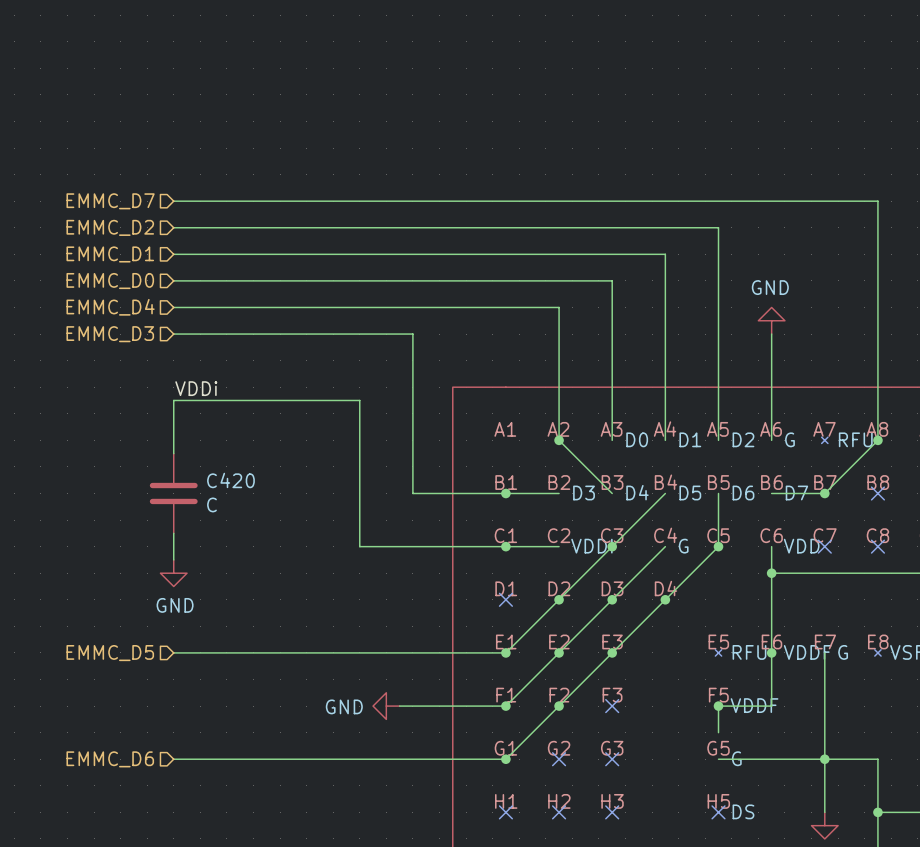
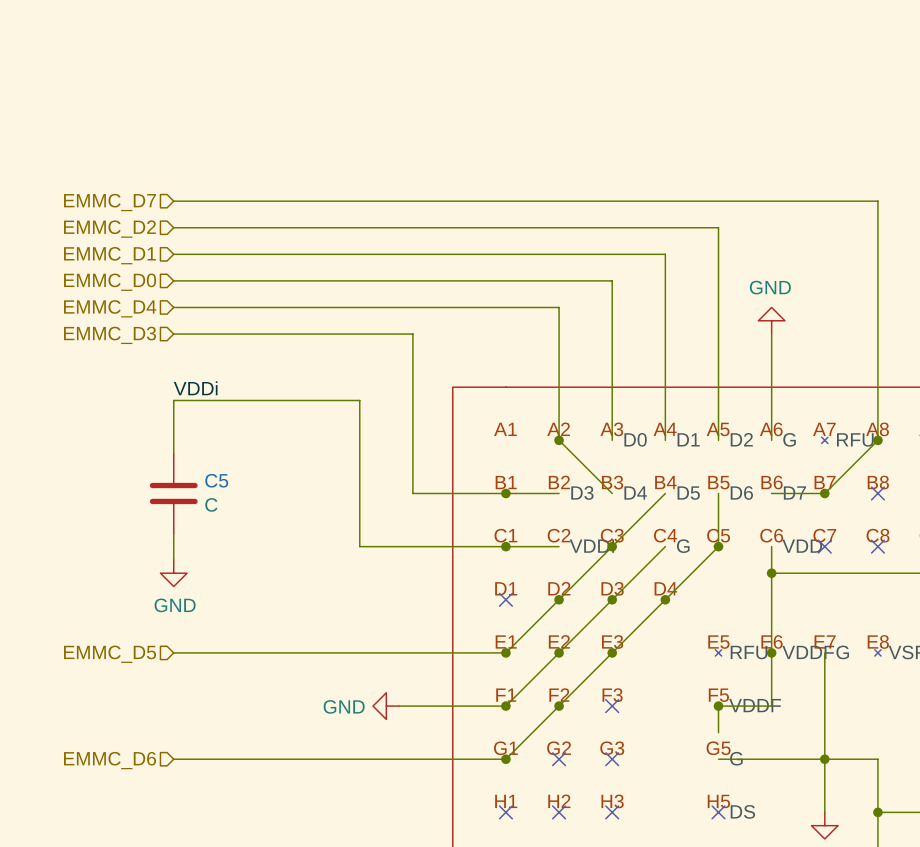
C420 name: C420 (230, 480) -> C5 (216, 480)

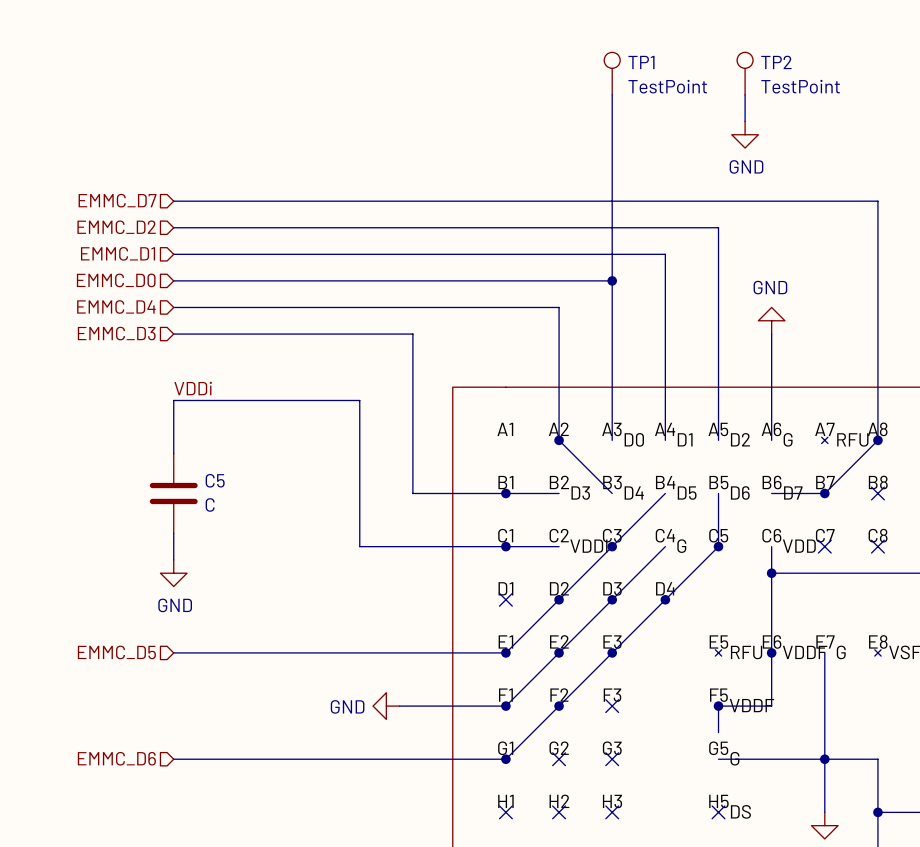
TP1: none -> TestPoint (612, 73)
TP2: none -> TestPoint (745, 73)
wire: none -> (612, 94) (612, 280)
wire: none -> (745, 94) (745, 121)
power symbol: none -> GND (745, 134)
junction: none -> (612, 280)

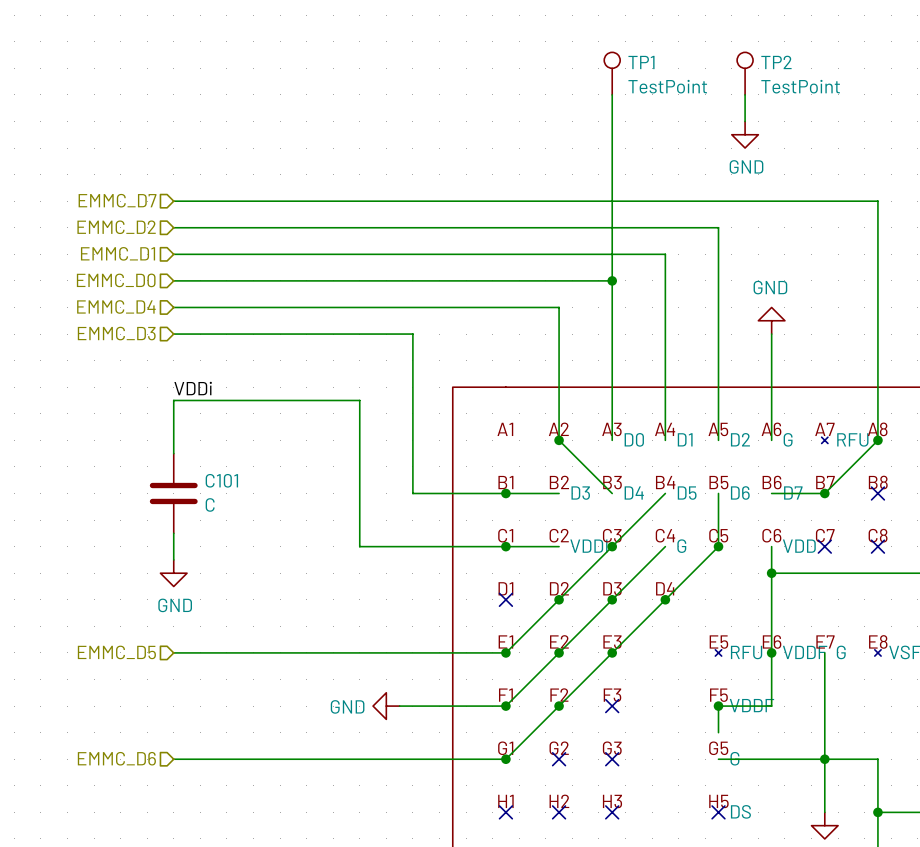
C5 name: C5 (215, 480) -> C101 (221, 480)

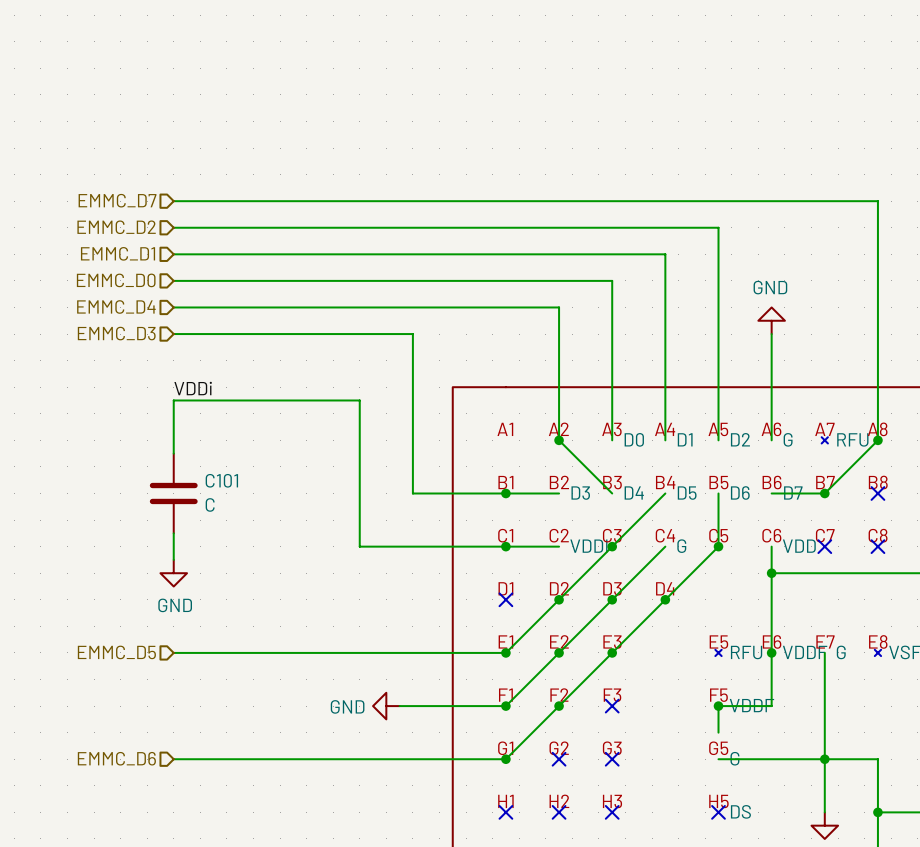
TP1: TestPoint (612, 73) -> none
TP2: TestPoint (745, 73) -> none
wire: (612, 94) (612, 280) -> none
wire: (745, 94) (745, 121) -> none
power symbol: GND (745, 134) -> none
junction: (612, 280) -> none

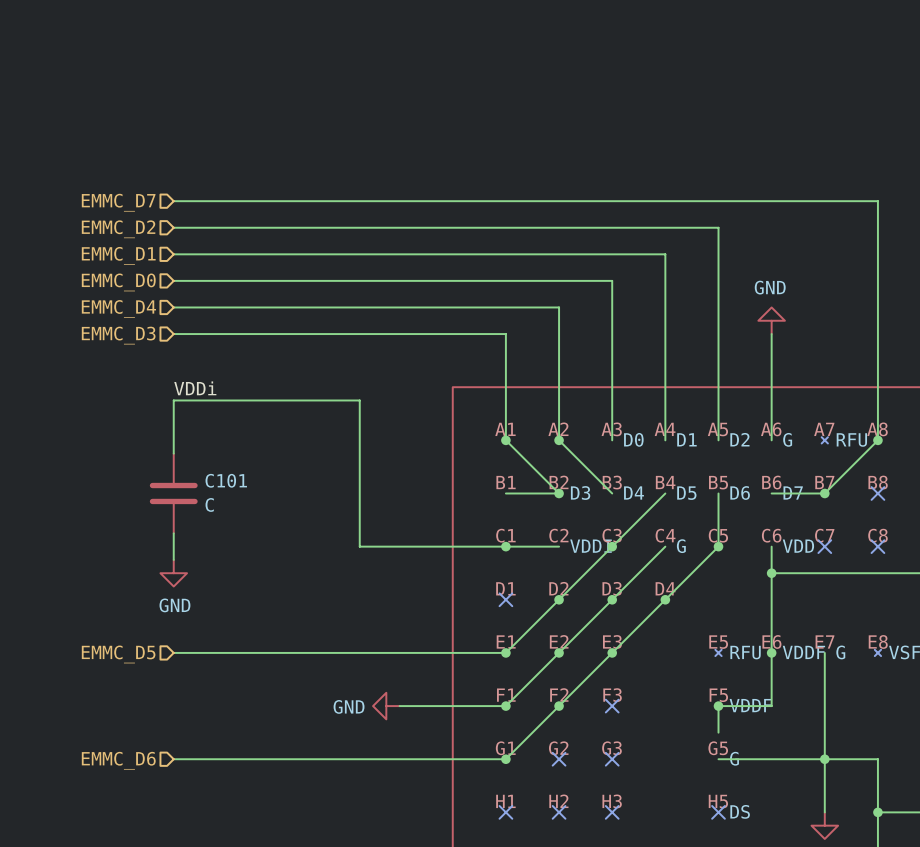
wire: (412, 334) (412, 493) (505, 493) -> (412, 334) (505, 334) (505, 440) (559, 493)
junction: none -> (505, 440)
junction: (505, 493) -> none
junction: none -> (559, 493)

